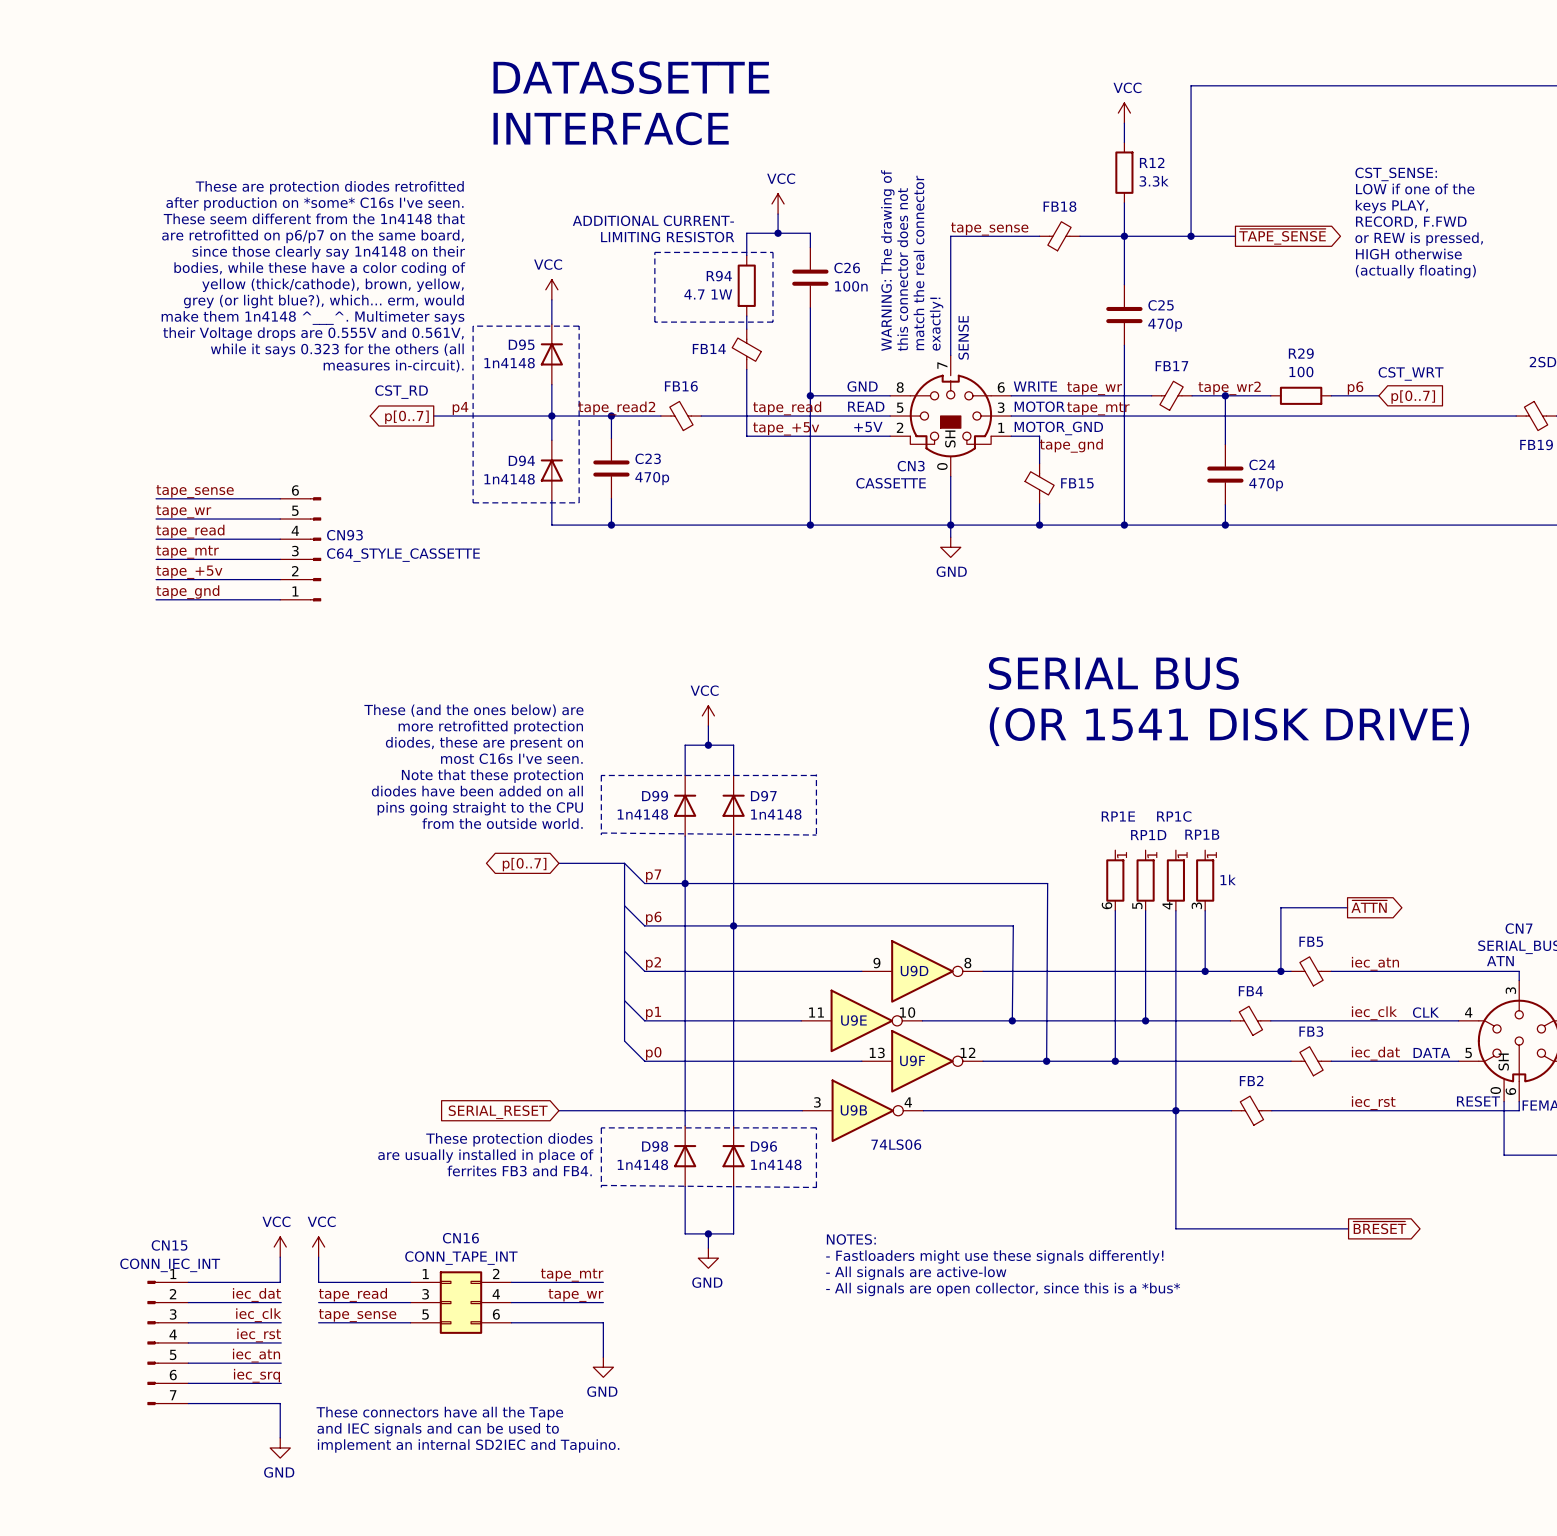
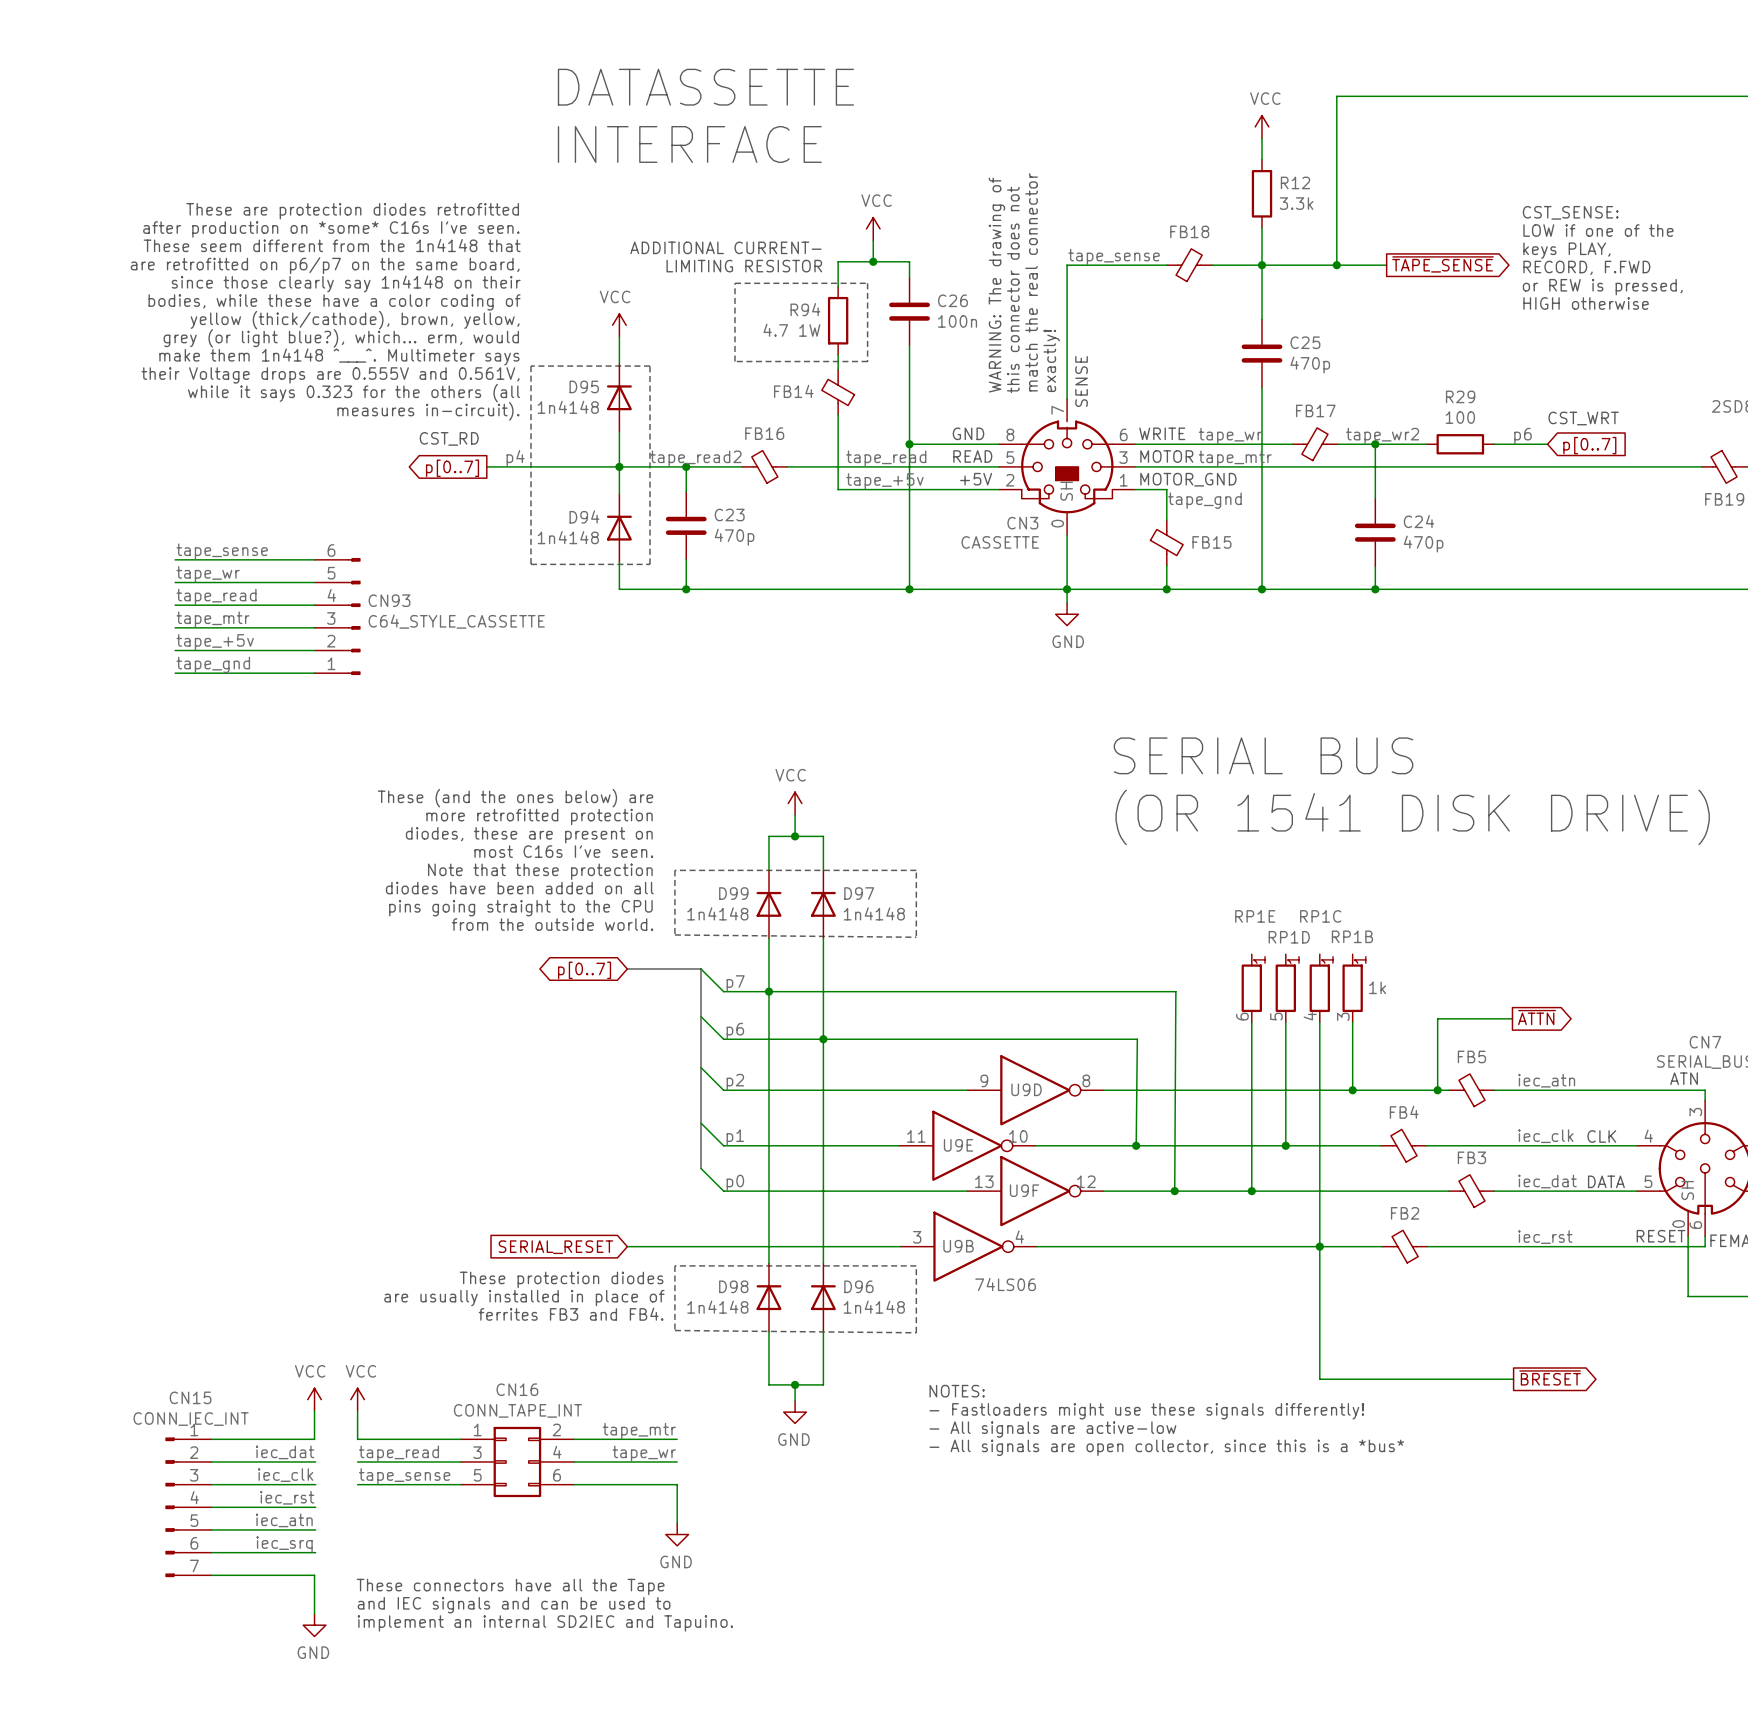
text: CST_SENSE: (1396, 174) -> none
text: LOW if one of the (1415, 189) -> CST_SENSE: (1570, 212)
text: keys PLAY, (1391, 206) -> LOW if one of the (1598, 230)
text: RECORD, F.FWD (1411, 222) -> keys PLAY, (1566, 250)
text: or REW is pressed, (1419, 239) -> RECORD, F.FWD (1586, 267)
text: HIGH otherwise (1408, 254) -> or REW is pressed, (1602, 287)
text: (actually floating) (1415, 271) -> HIGH otherwise (1586, 303)

